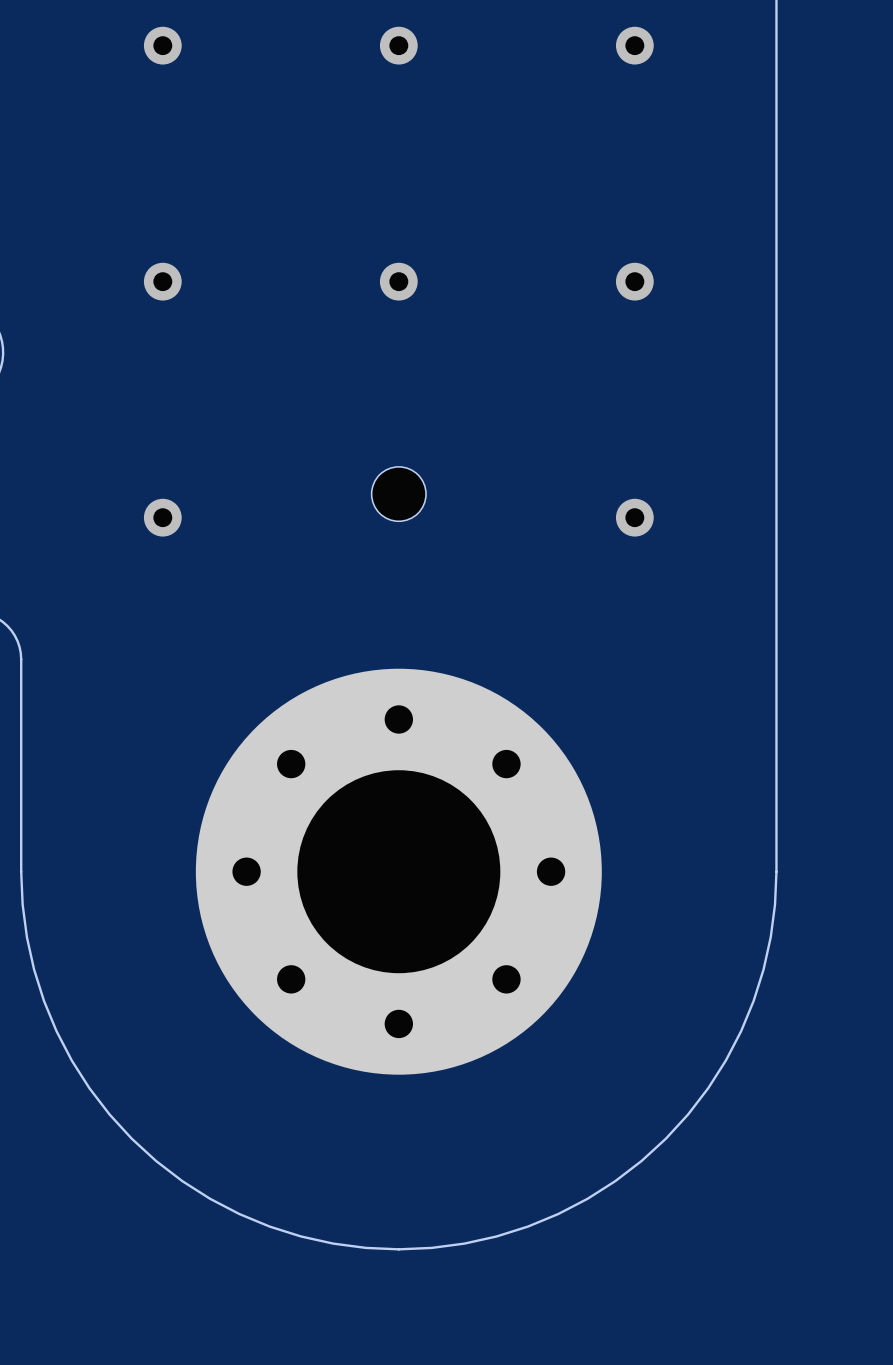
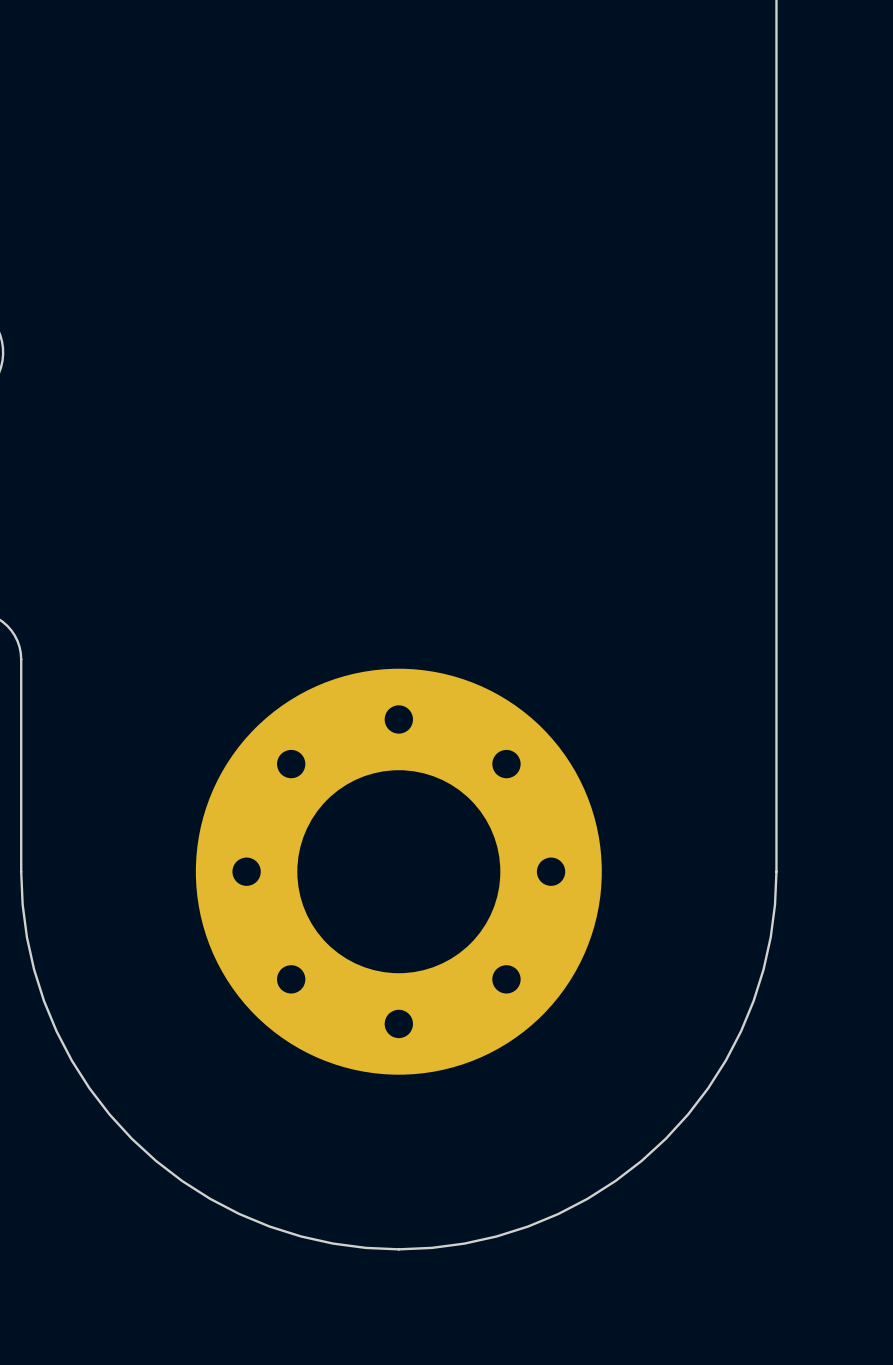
via: (162, 45) -> none
via: (398, 45) -> none
via: (634, 45) -> none
via: (162, 281) -> none
via: (398, 281) -> none
via: (634, 281) -> none
part: (398, 494) -> none
via: (162, 517) -> none
via: (634, 517) -> none

